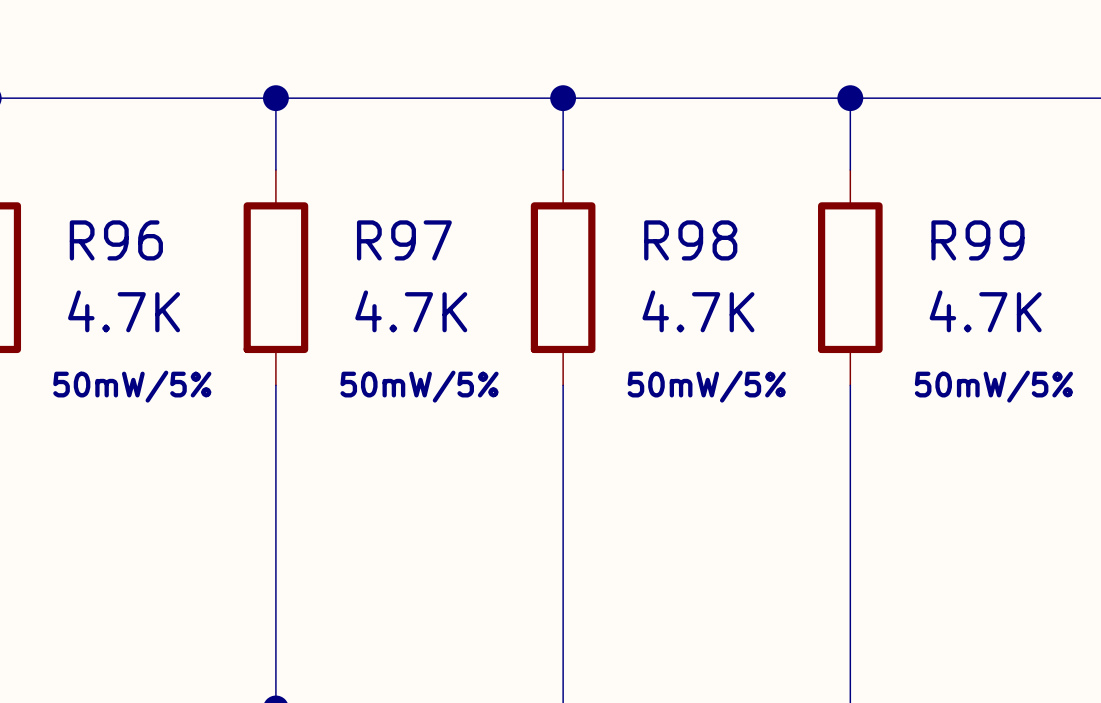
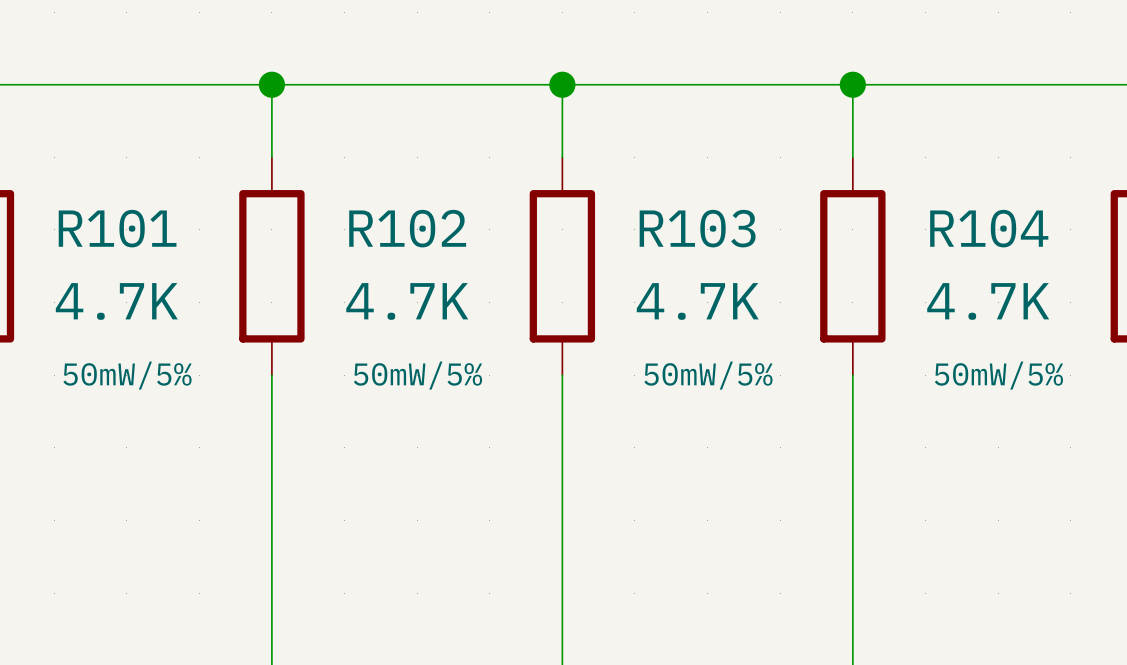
R96 name: R96 (116, 240) -> R101 (117, 228)
R97 name: R97 (404, 240) -> R102 (407, 228)
R98 name: R98 (690, 240) -> R103 (697, 228)
R99 name: R99 (977, 240) -> R104 (989, 228)

